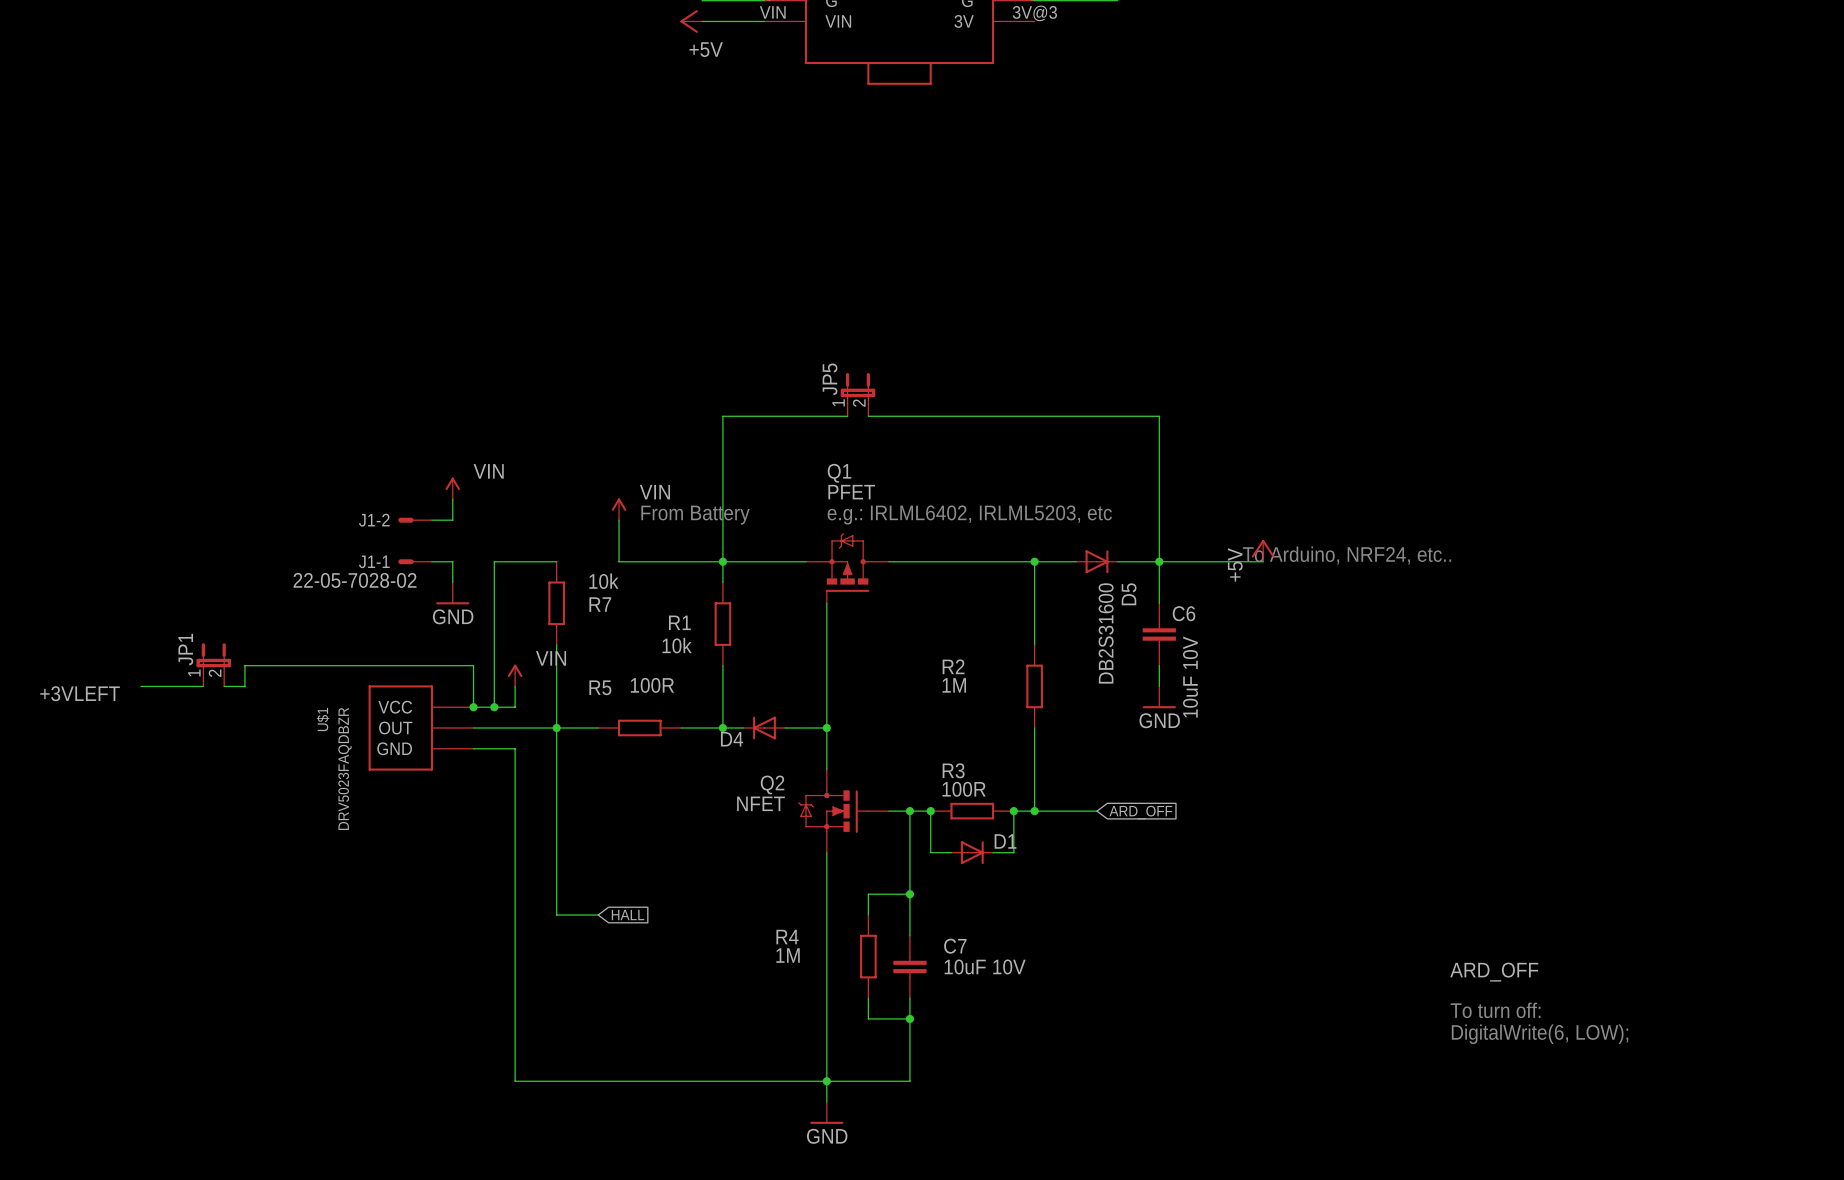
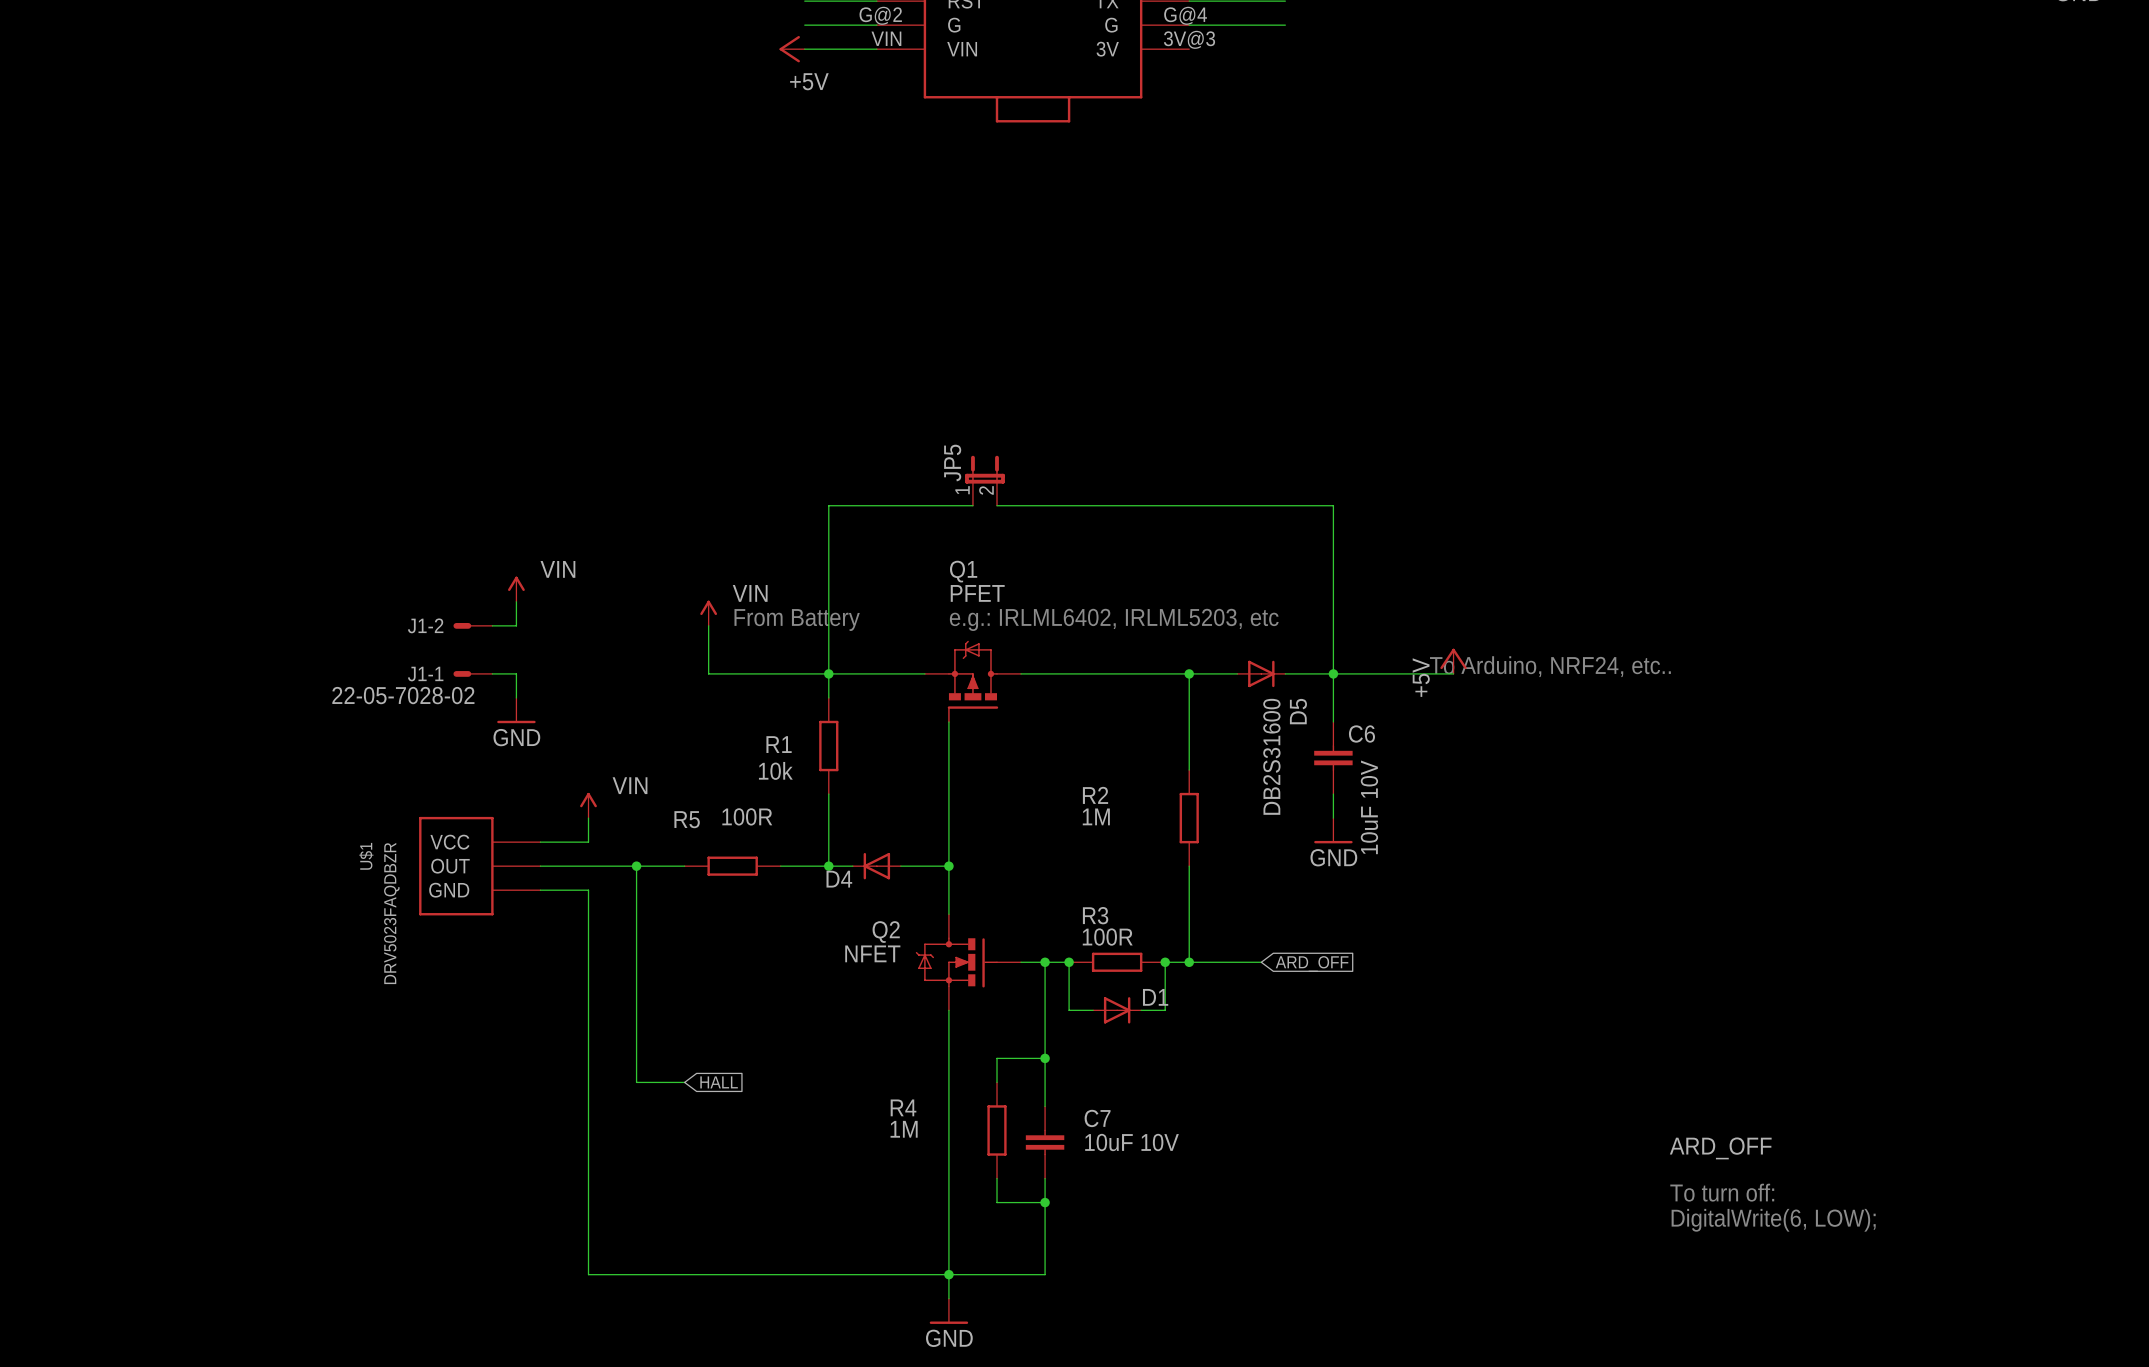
wire: (556, 561) (494, 561) (494, 707) -> none
R7: 10k (556, 603) -> none
wire: (556, 644) (556, 727) -> none
JP1: (213, 664) -> none
wire: (141, 686) (203, 686) -> none
wire: (224, 686) (244, 686) (244, 665) (473, 665) (473, 707) -> none
label: +3VLEFT (80, 693) -> none
junction: (473, 707) -> none
junction: (494, 707) -> none

